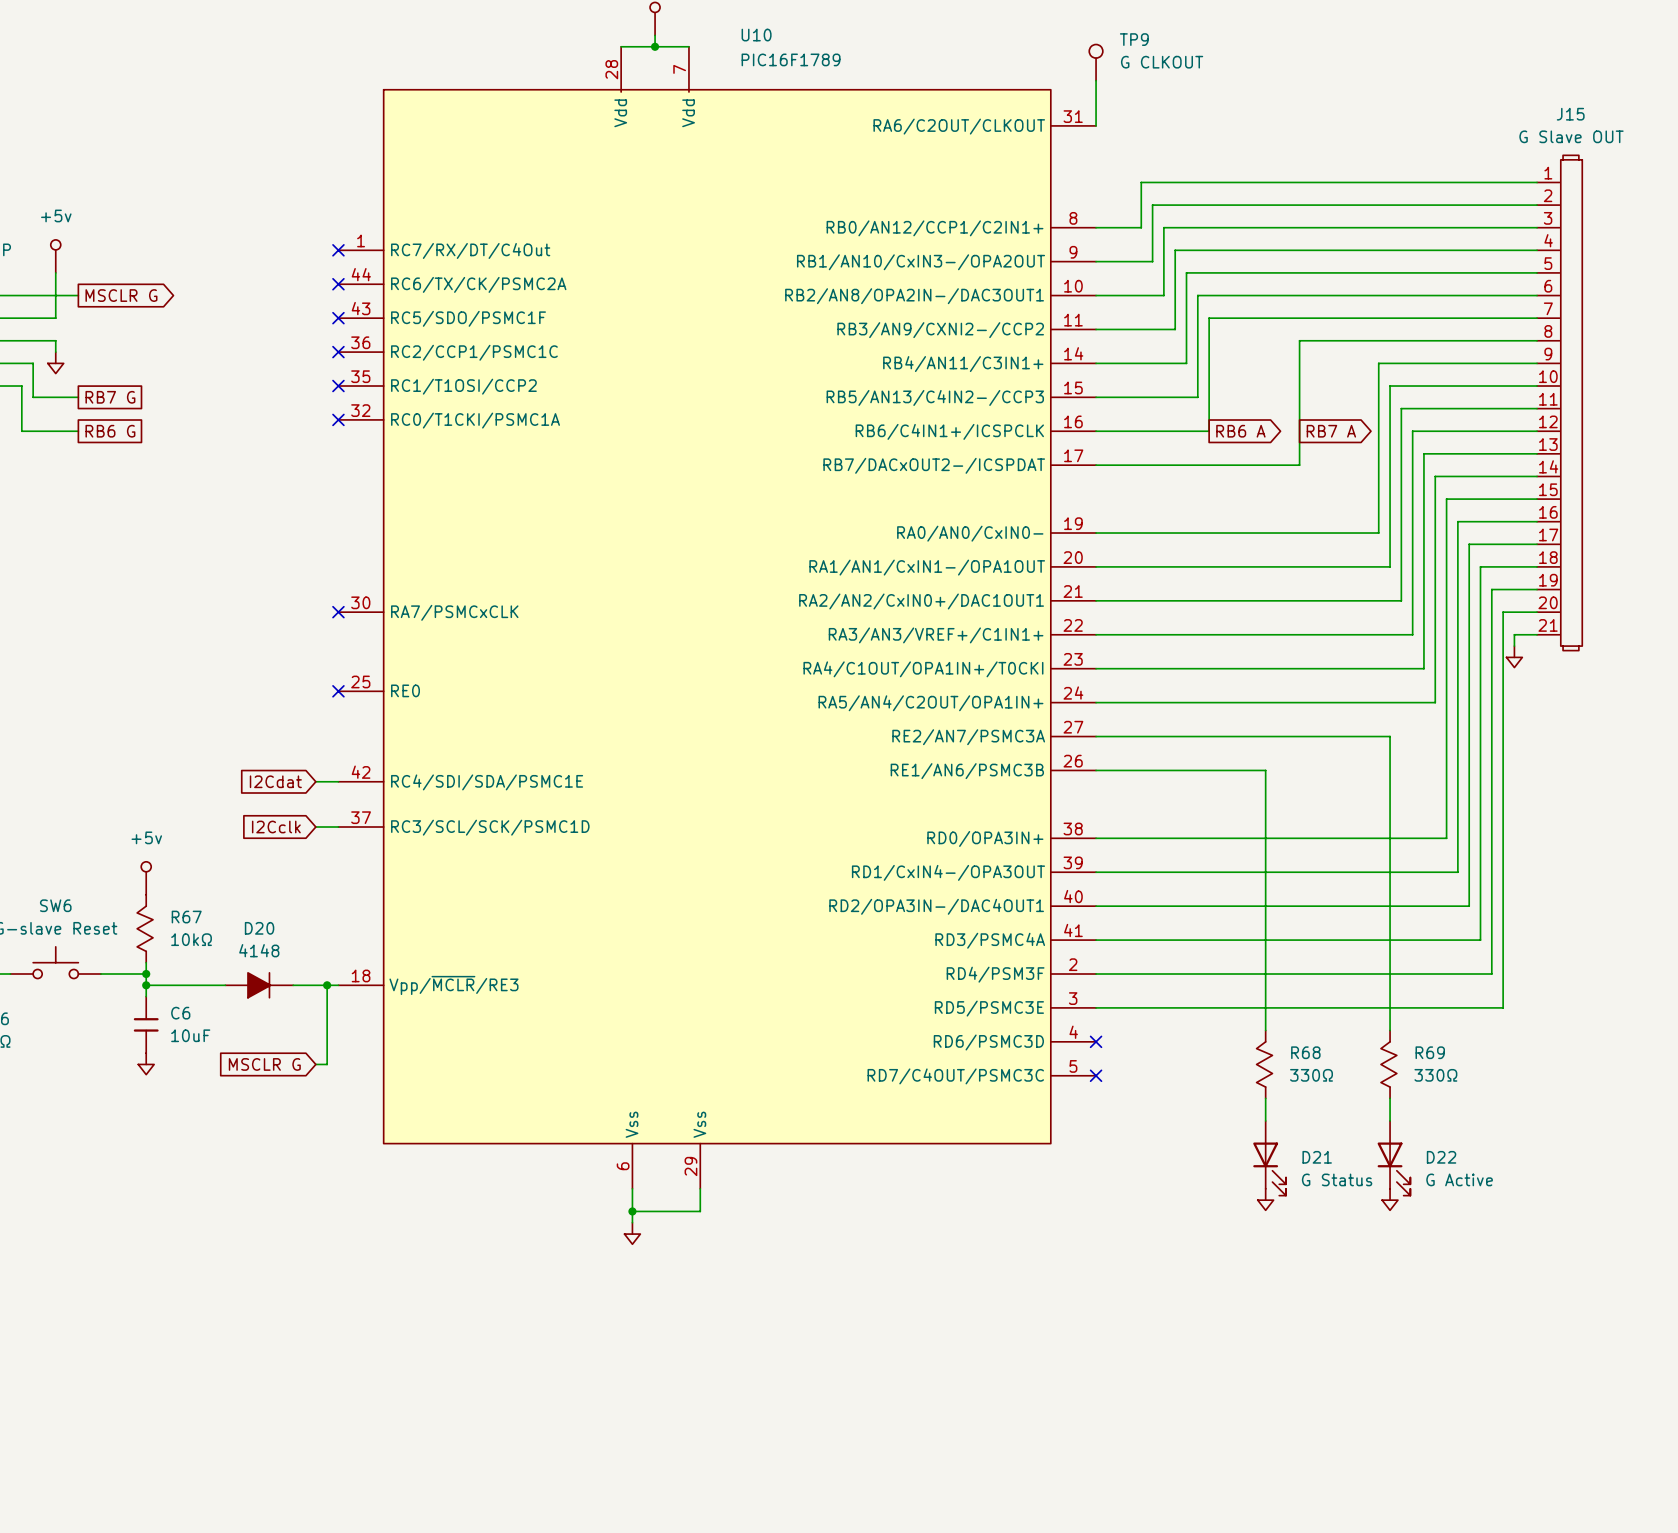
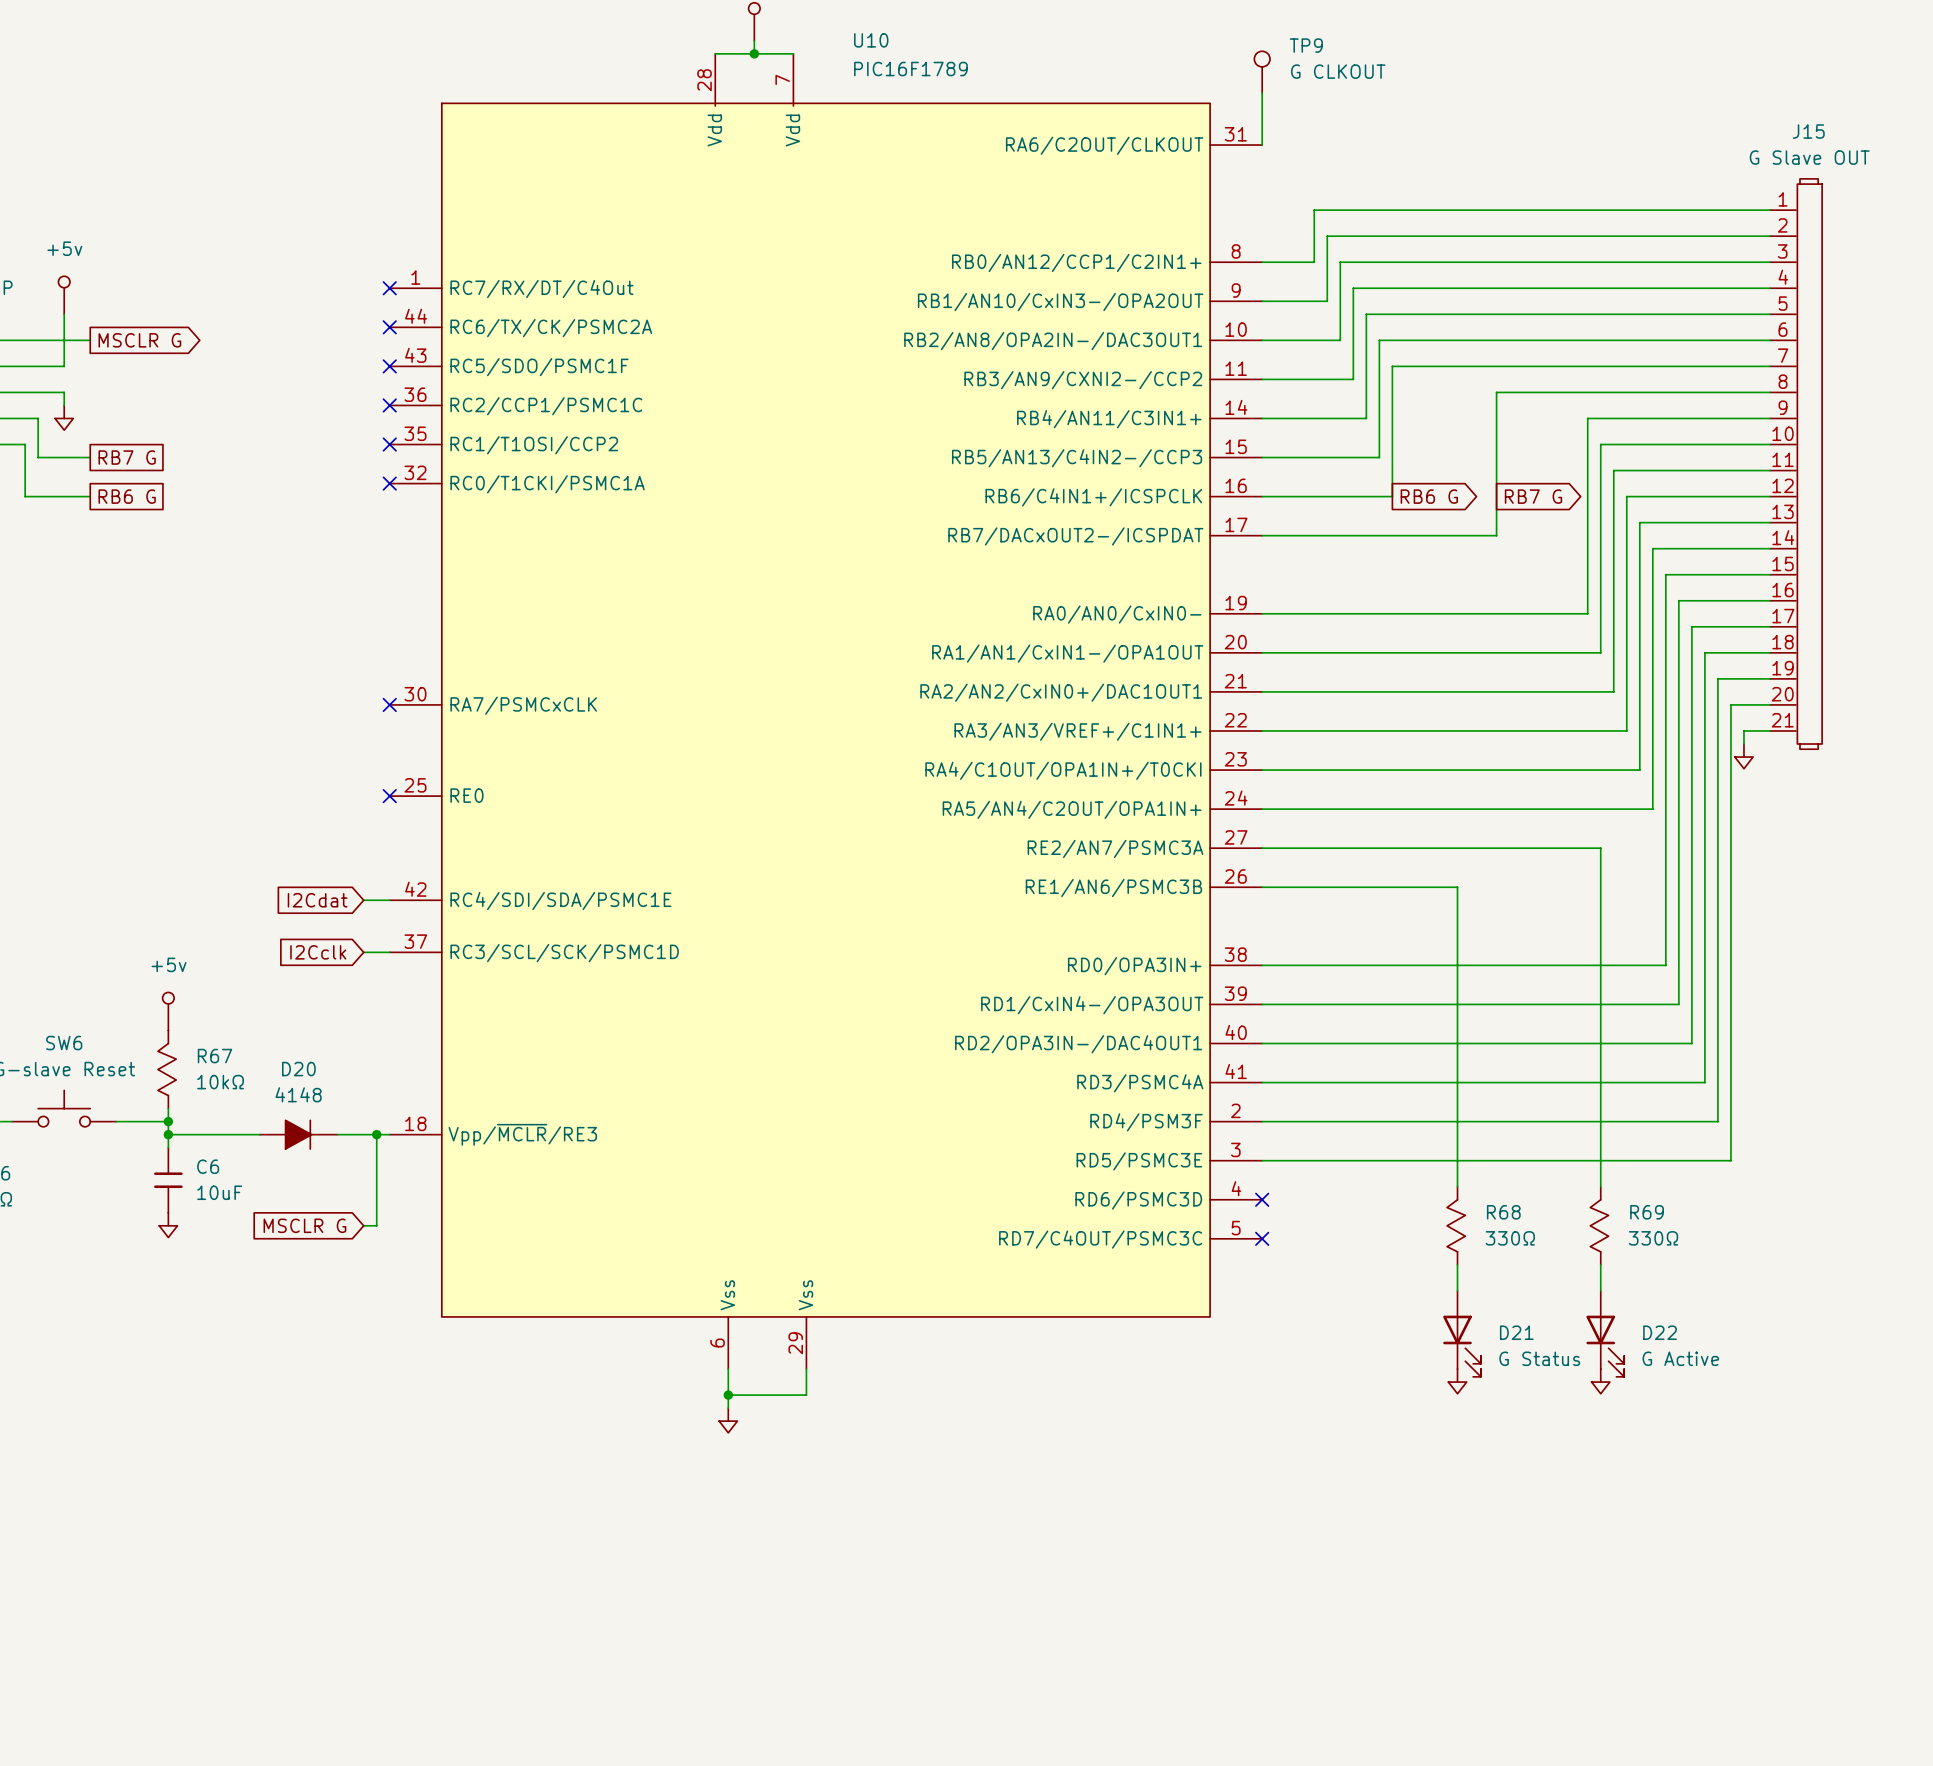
global label: RB6 A (1240, 431) -> RB6 G (1429, 496)
global label: RB7 A (1331, 431) -> RB7 G (1533, 496)

